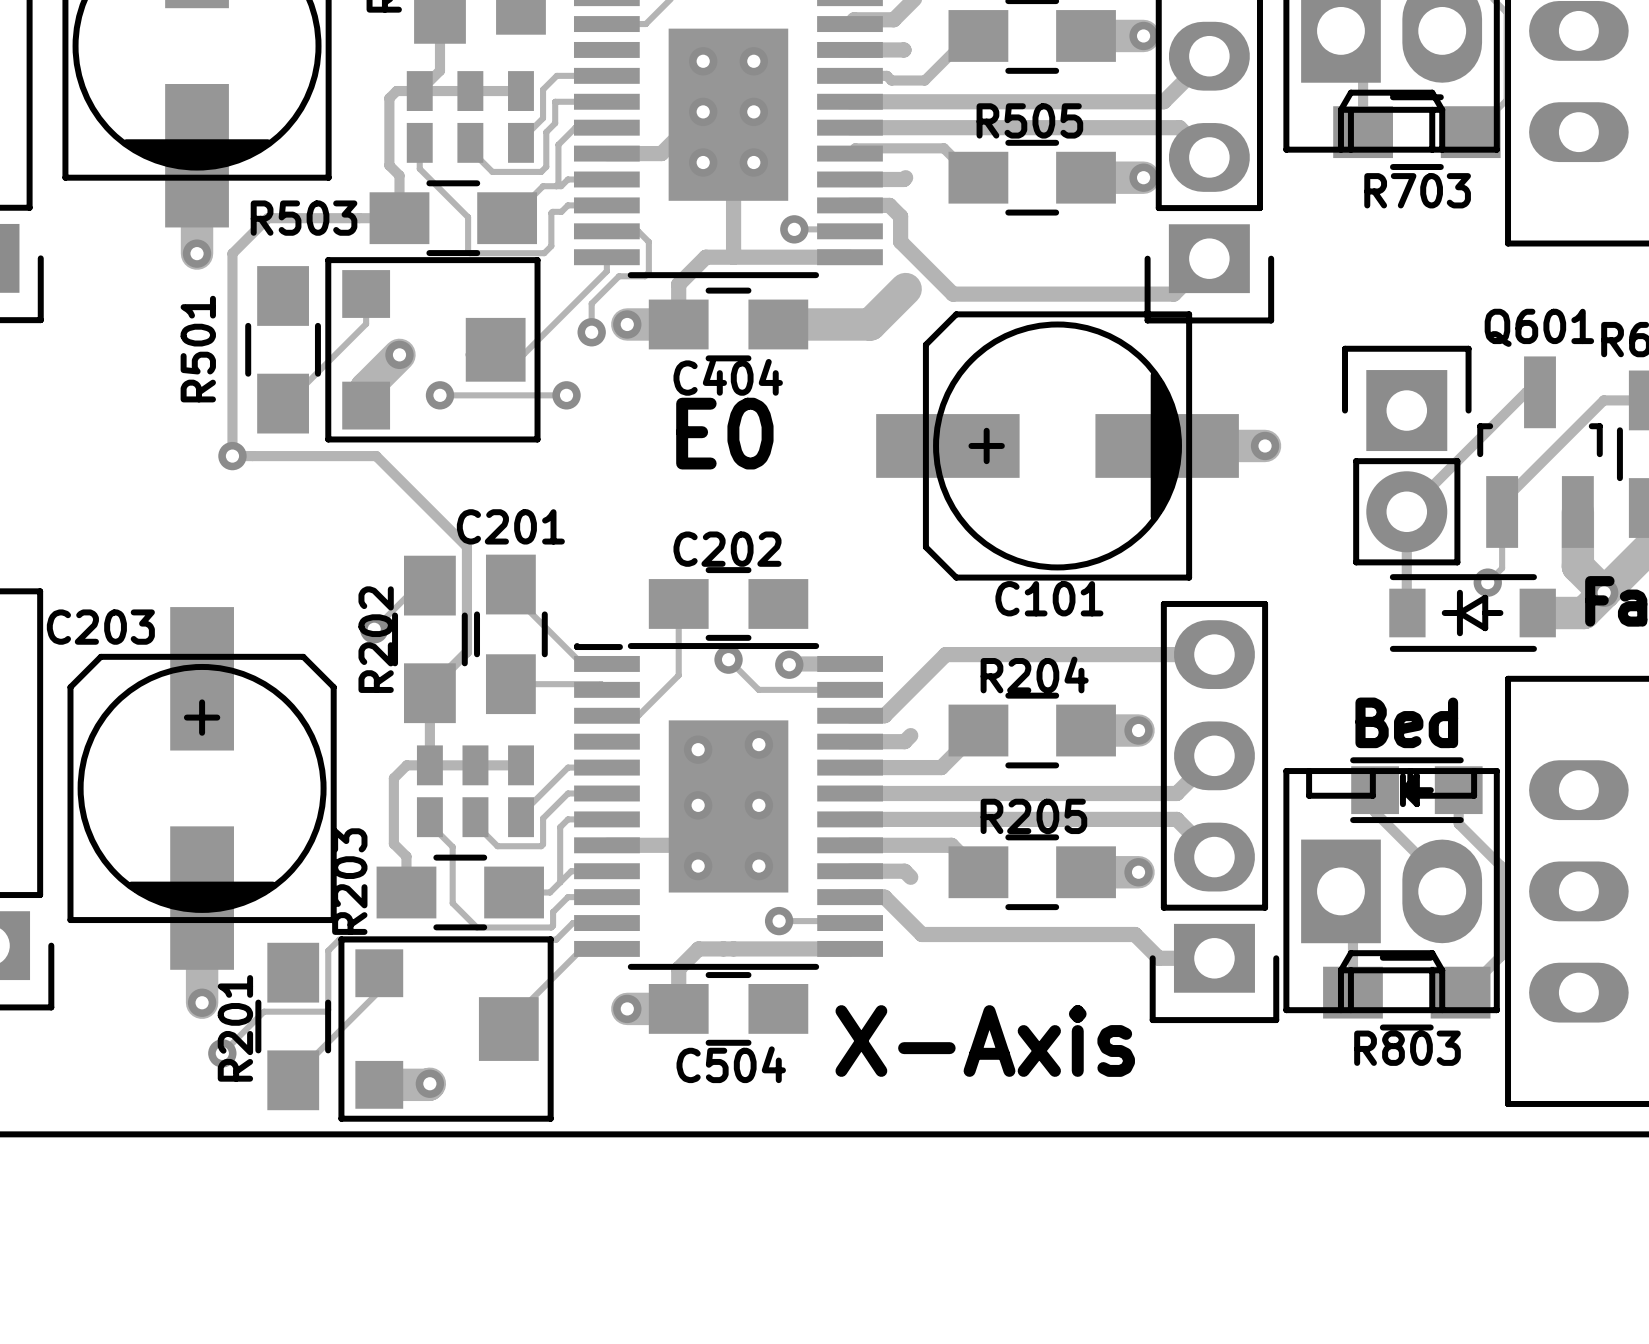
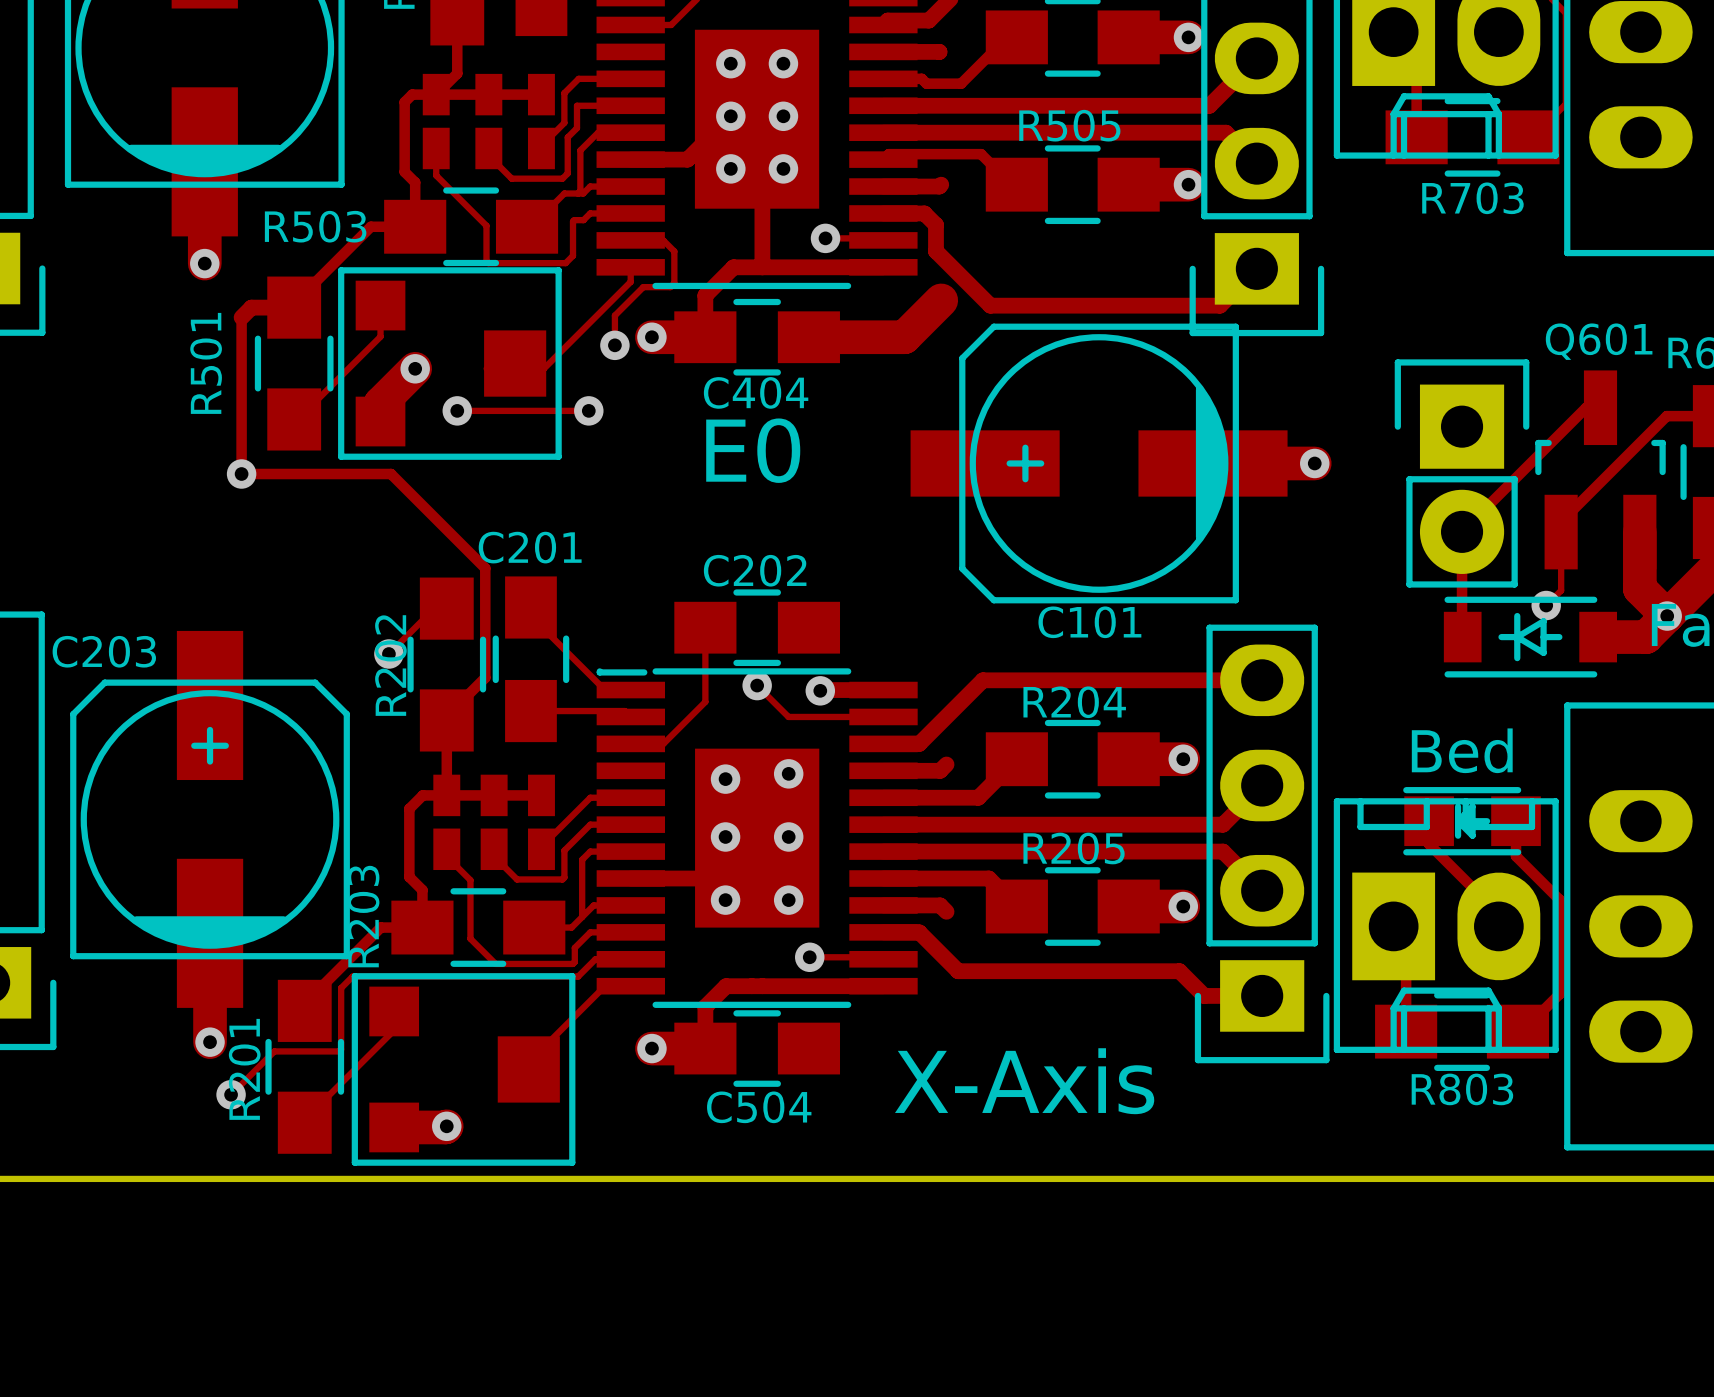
track: (356, 218) (267, 218) (232, 253) (232, 305) -> (370, 226) (294, 303)
track: none -> (294, 307) (251, 307) (241, 317)
track: none -> (422, 927) (380, 927) (304, 1003)

